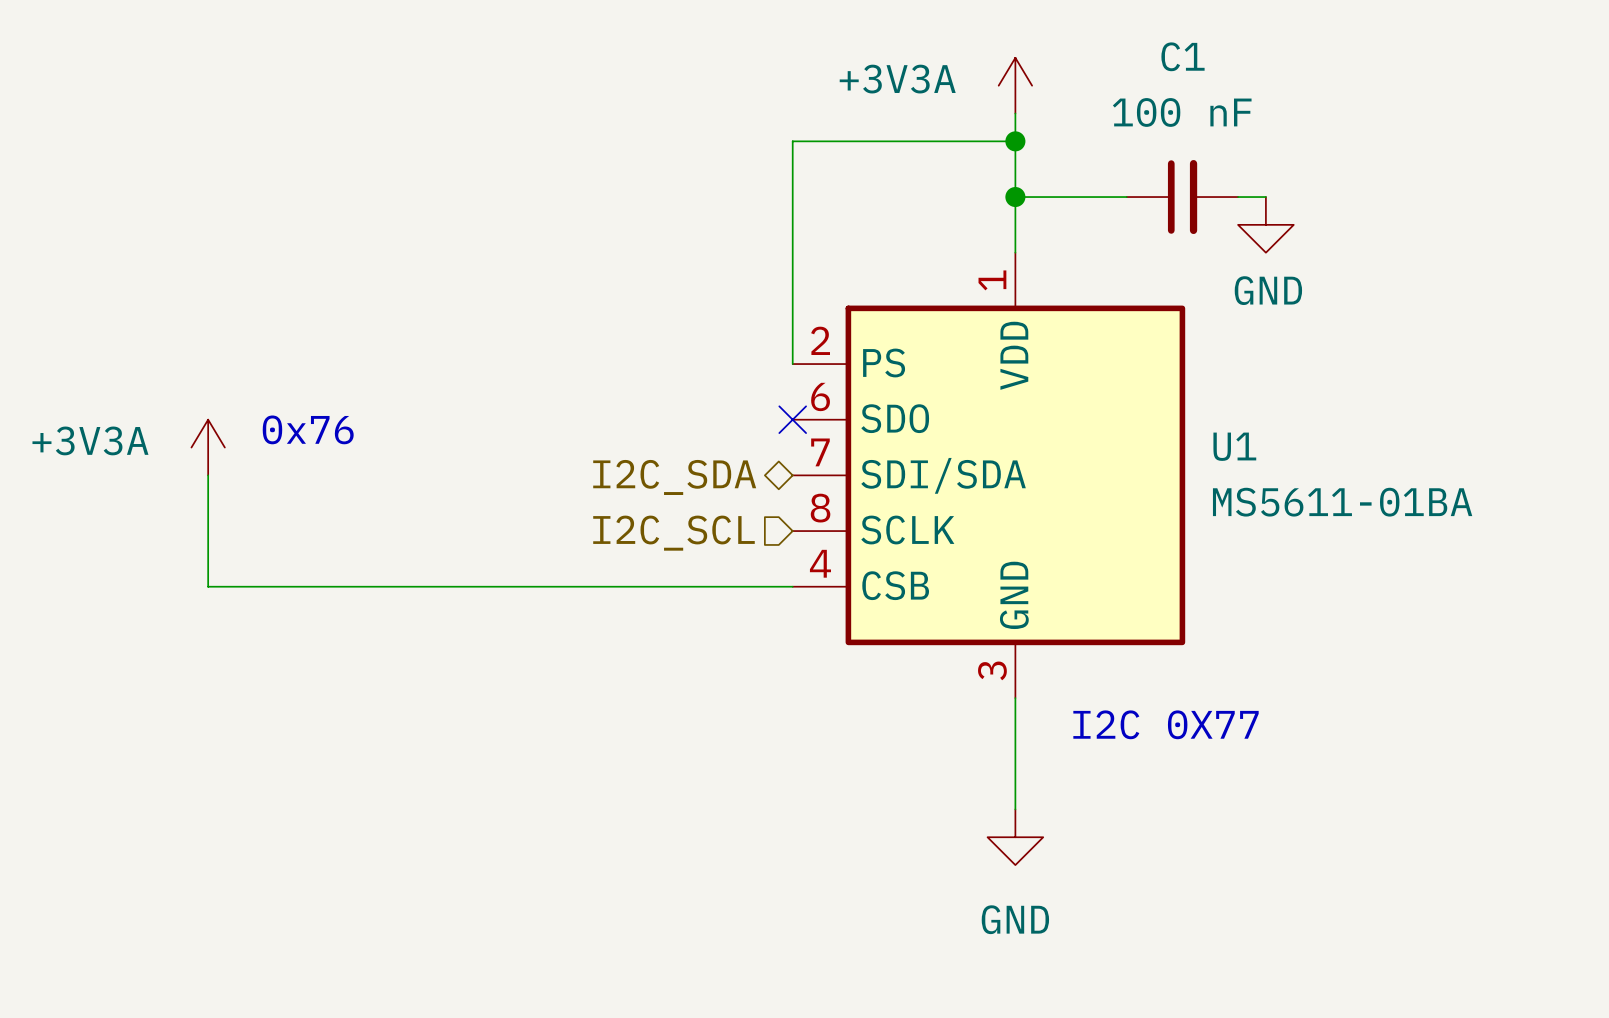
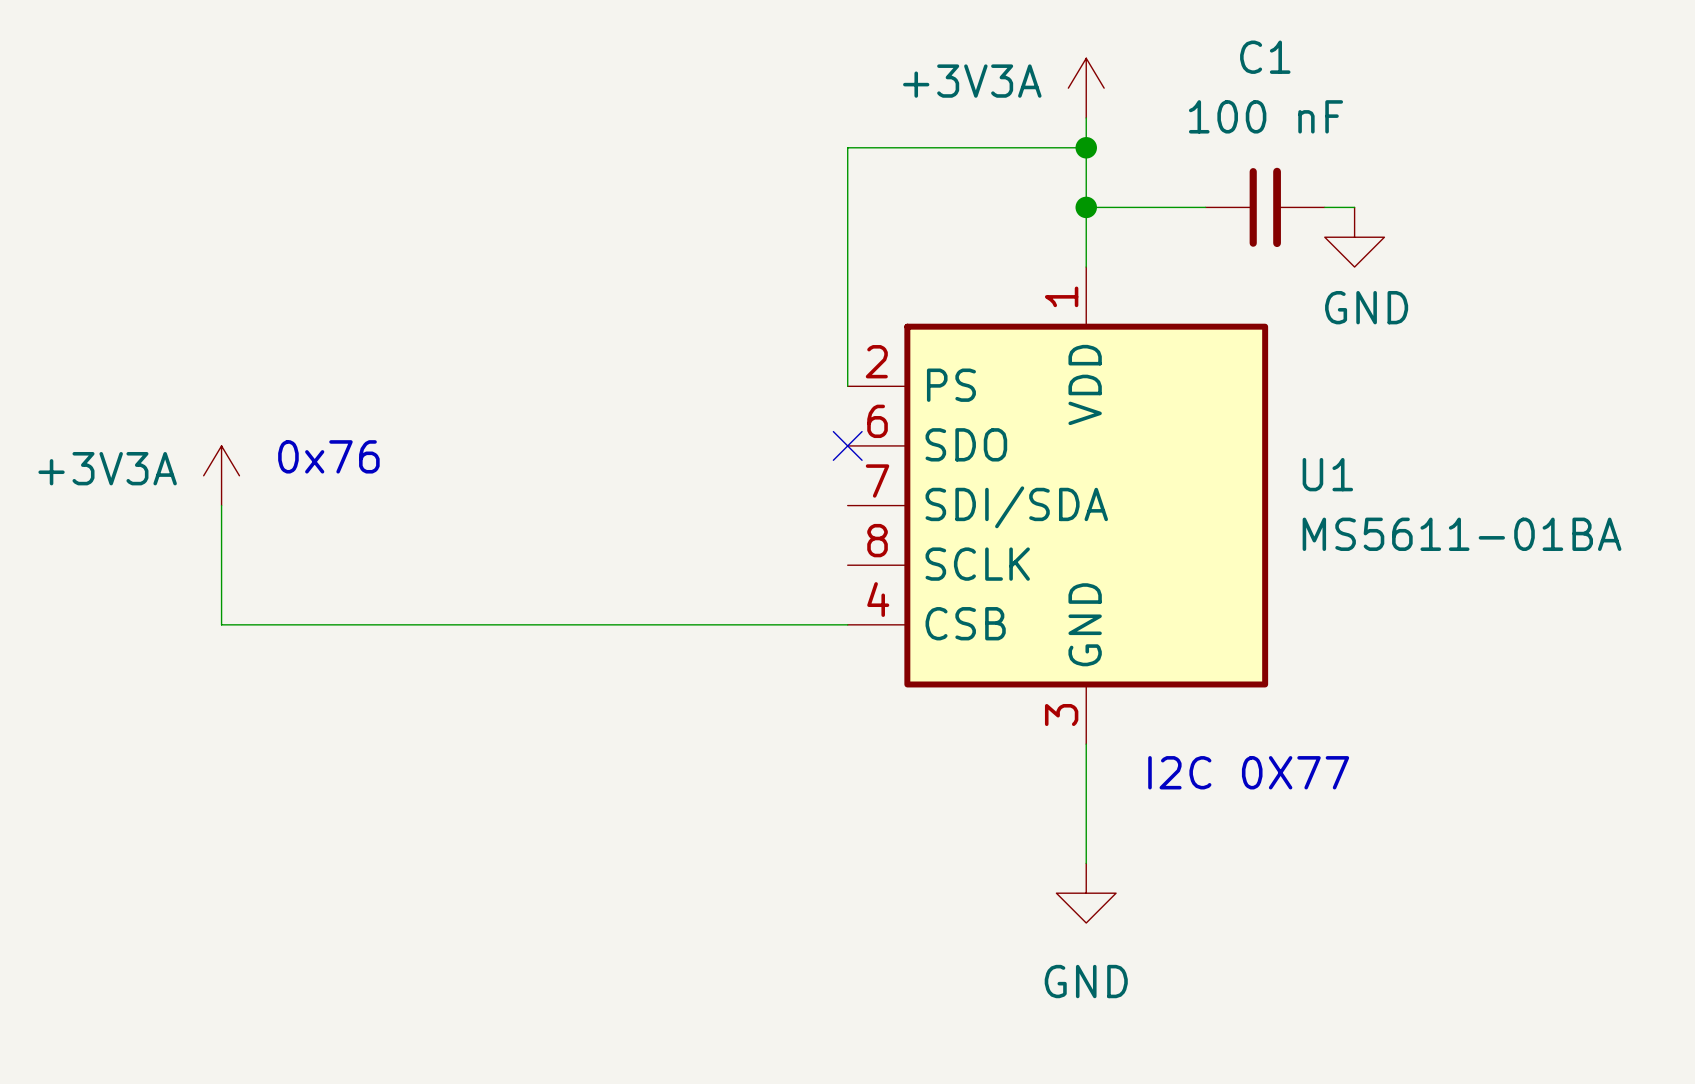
hierarchical label: I2C_SDA (674, 477) -> none
hierarchical label: I2C_SCL (673, 533) -> none

